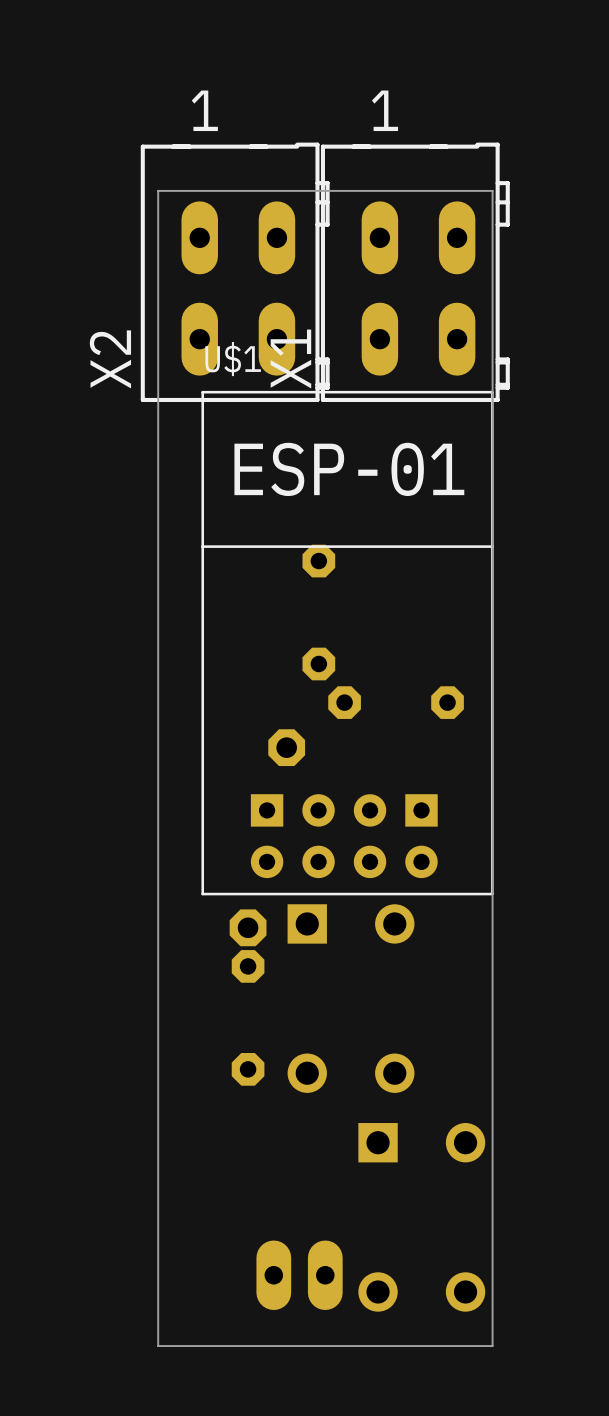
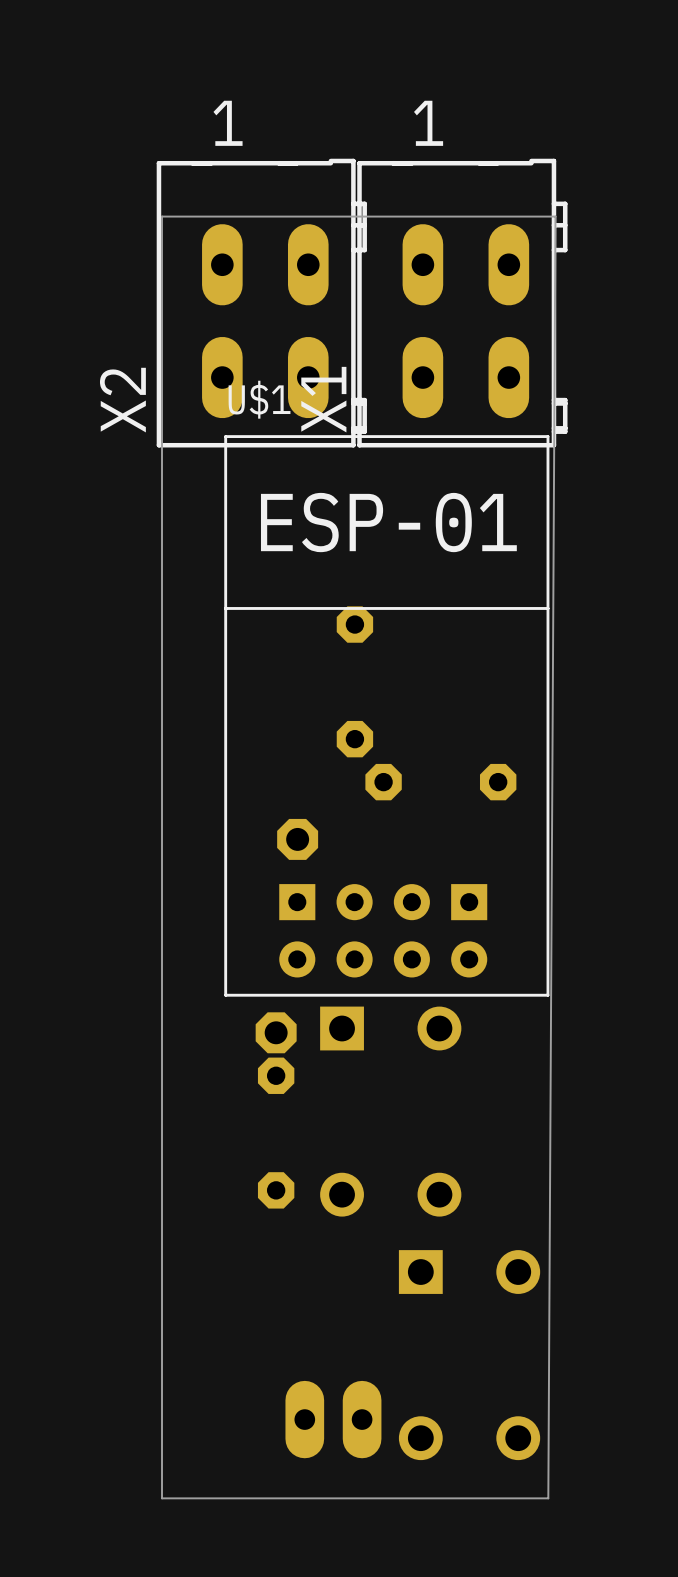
part position: (286, 747) -> (297, 839)
board edge: (492, 1346) (492, 190) (158, 190) (158, 1346) -> (548, 1498) (555, 216) (162, 216) (162, 1498) (176, 1498)

